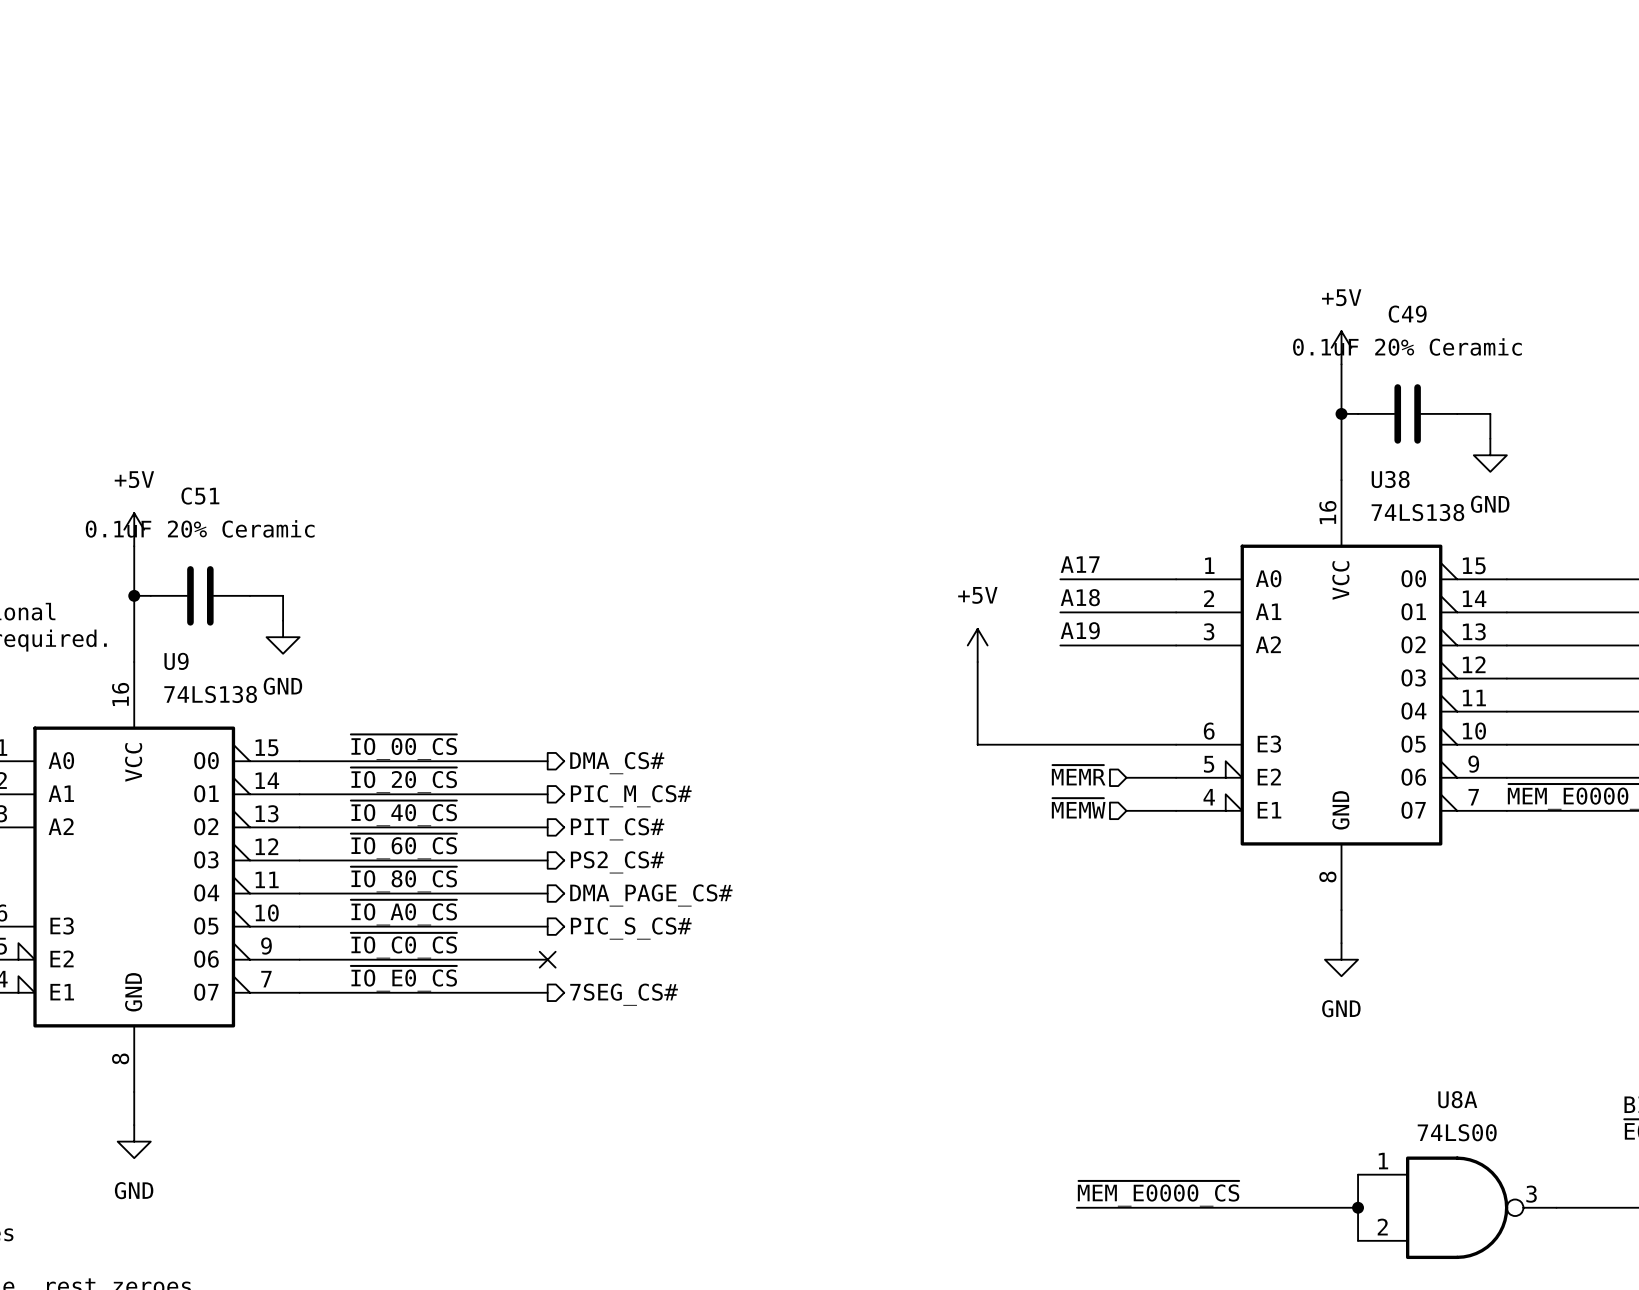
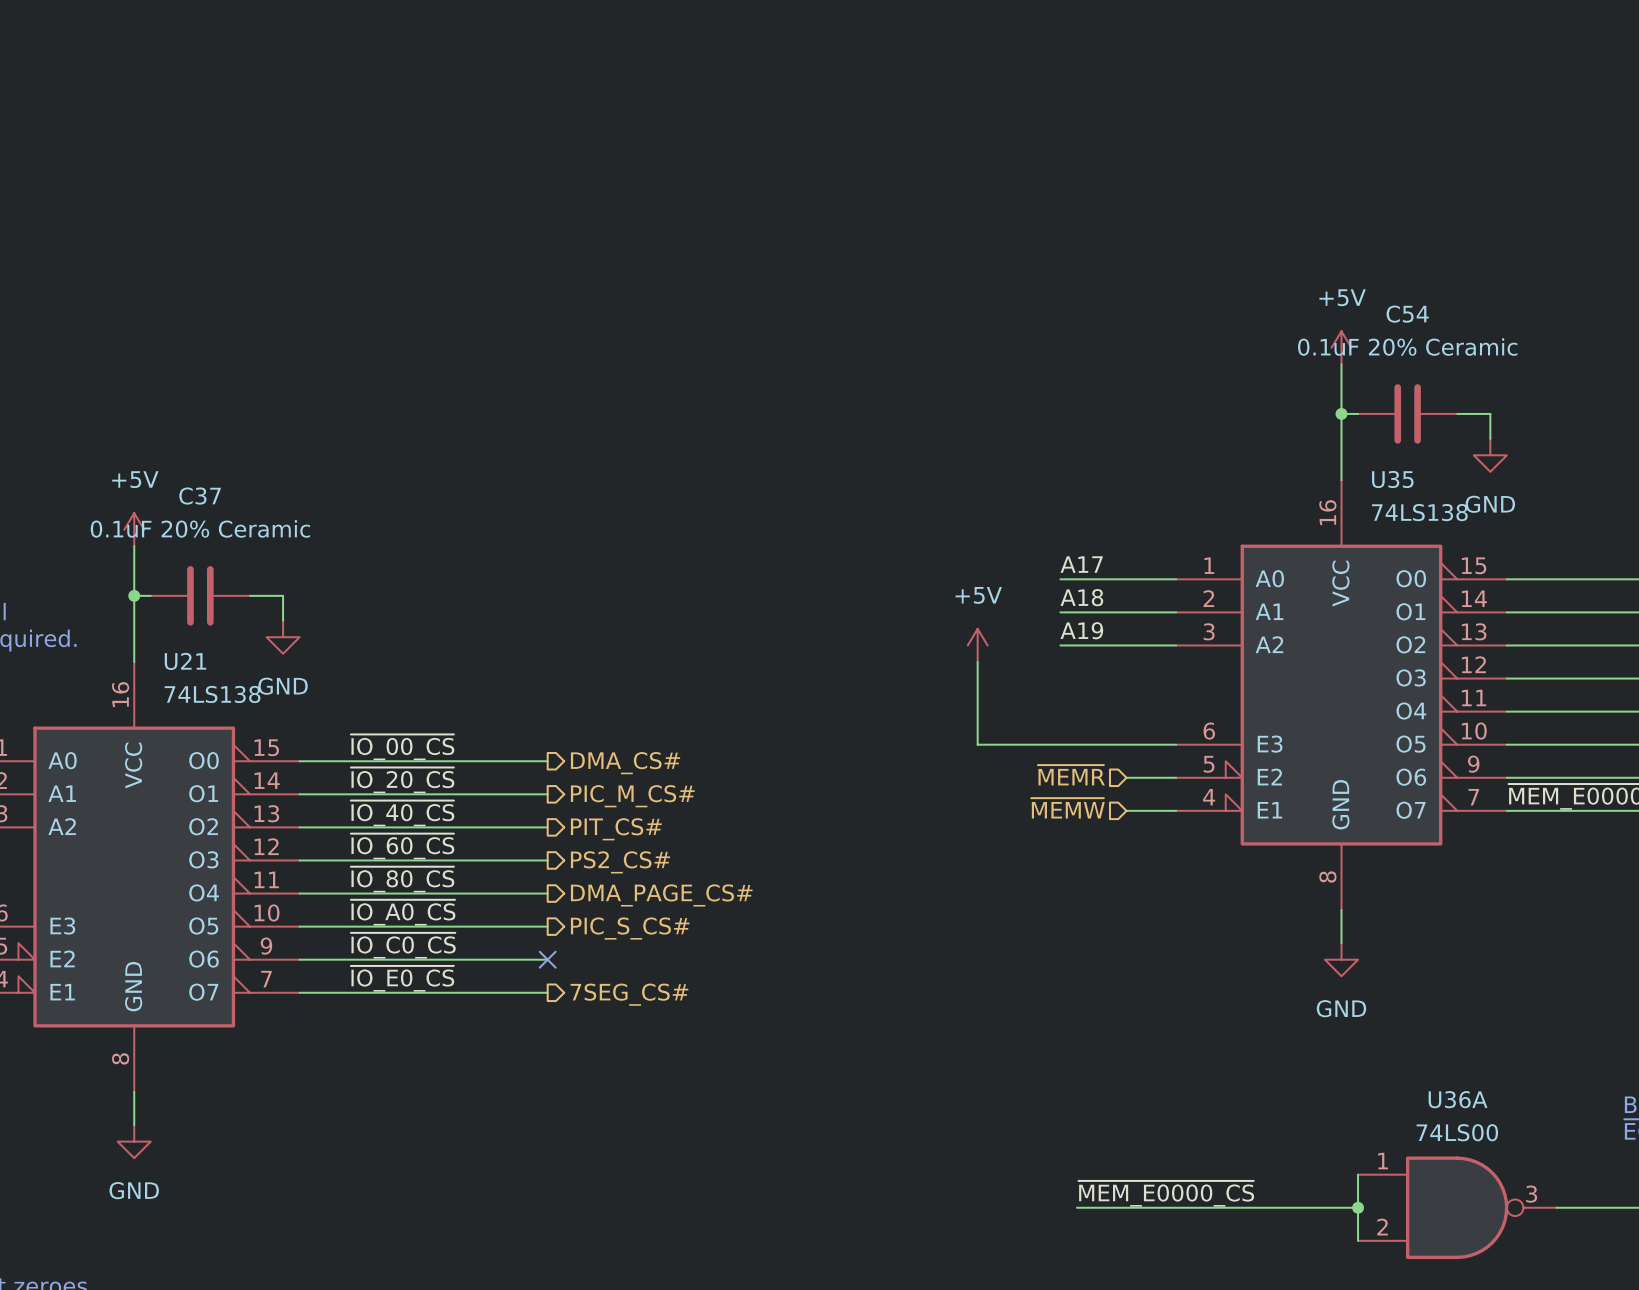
C49 name: C49 (1407, 314) -> C54 (1407, 314)
U38 name: U38 (1390, 479) -> U35 (1392, 479)
C51 name: C51 (200, 496) -> C37 (200, 496)
U9 name: U9 (176, 661) -> U21 (185, 661)
U8A name: U8A (1457, 1099) -> U36A (1458, 1099)

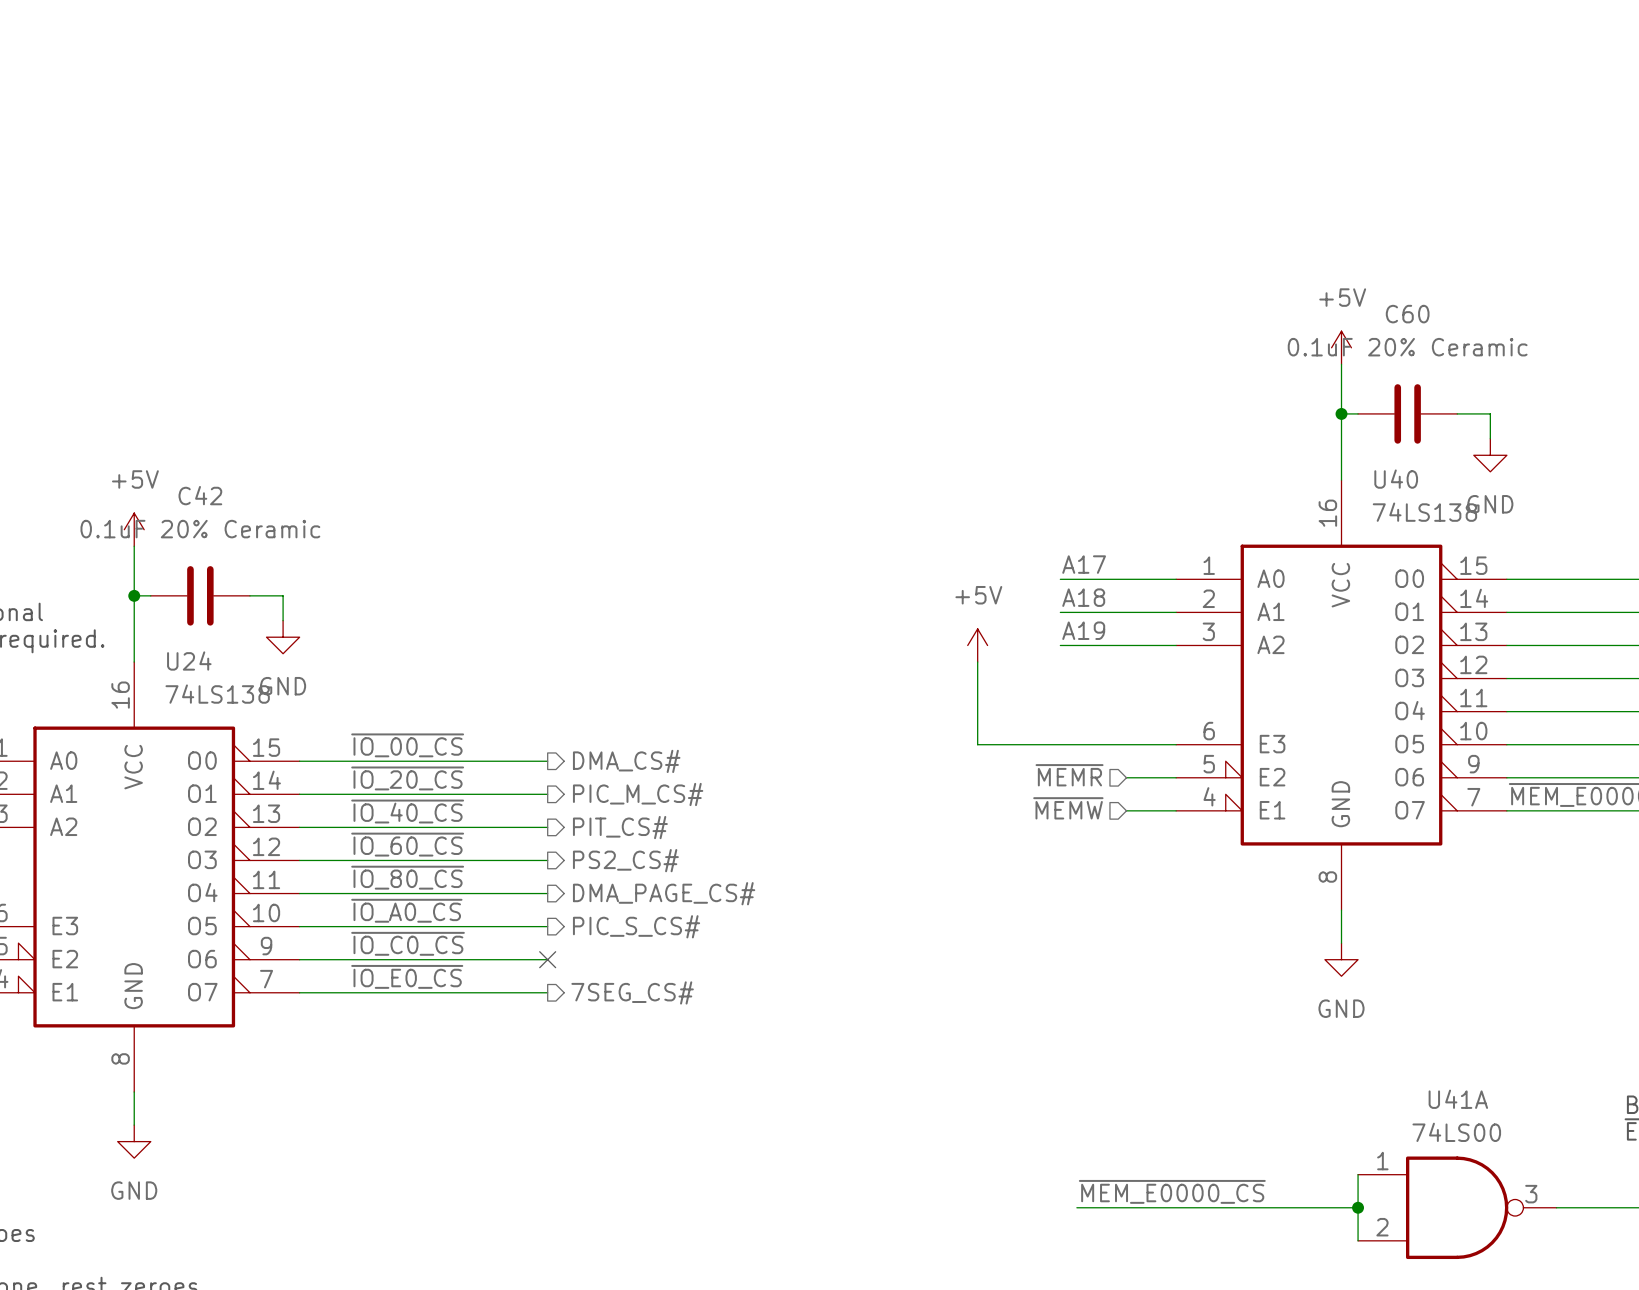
C54 name: C54 (1407, 314) -> C60 (1407, 314)
U35 name: U35 (1392, 479) -> U40 (1396, 479)
C37 name: C37 (200, 496) -> C42 (200, 495)
U21 name: U21 (185, 661) -> U24 (189, 661)
U36A name: U36A (1458, 1099) -> U41A (1458, 1099)

